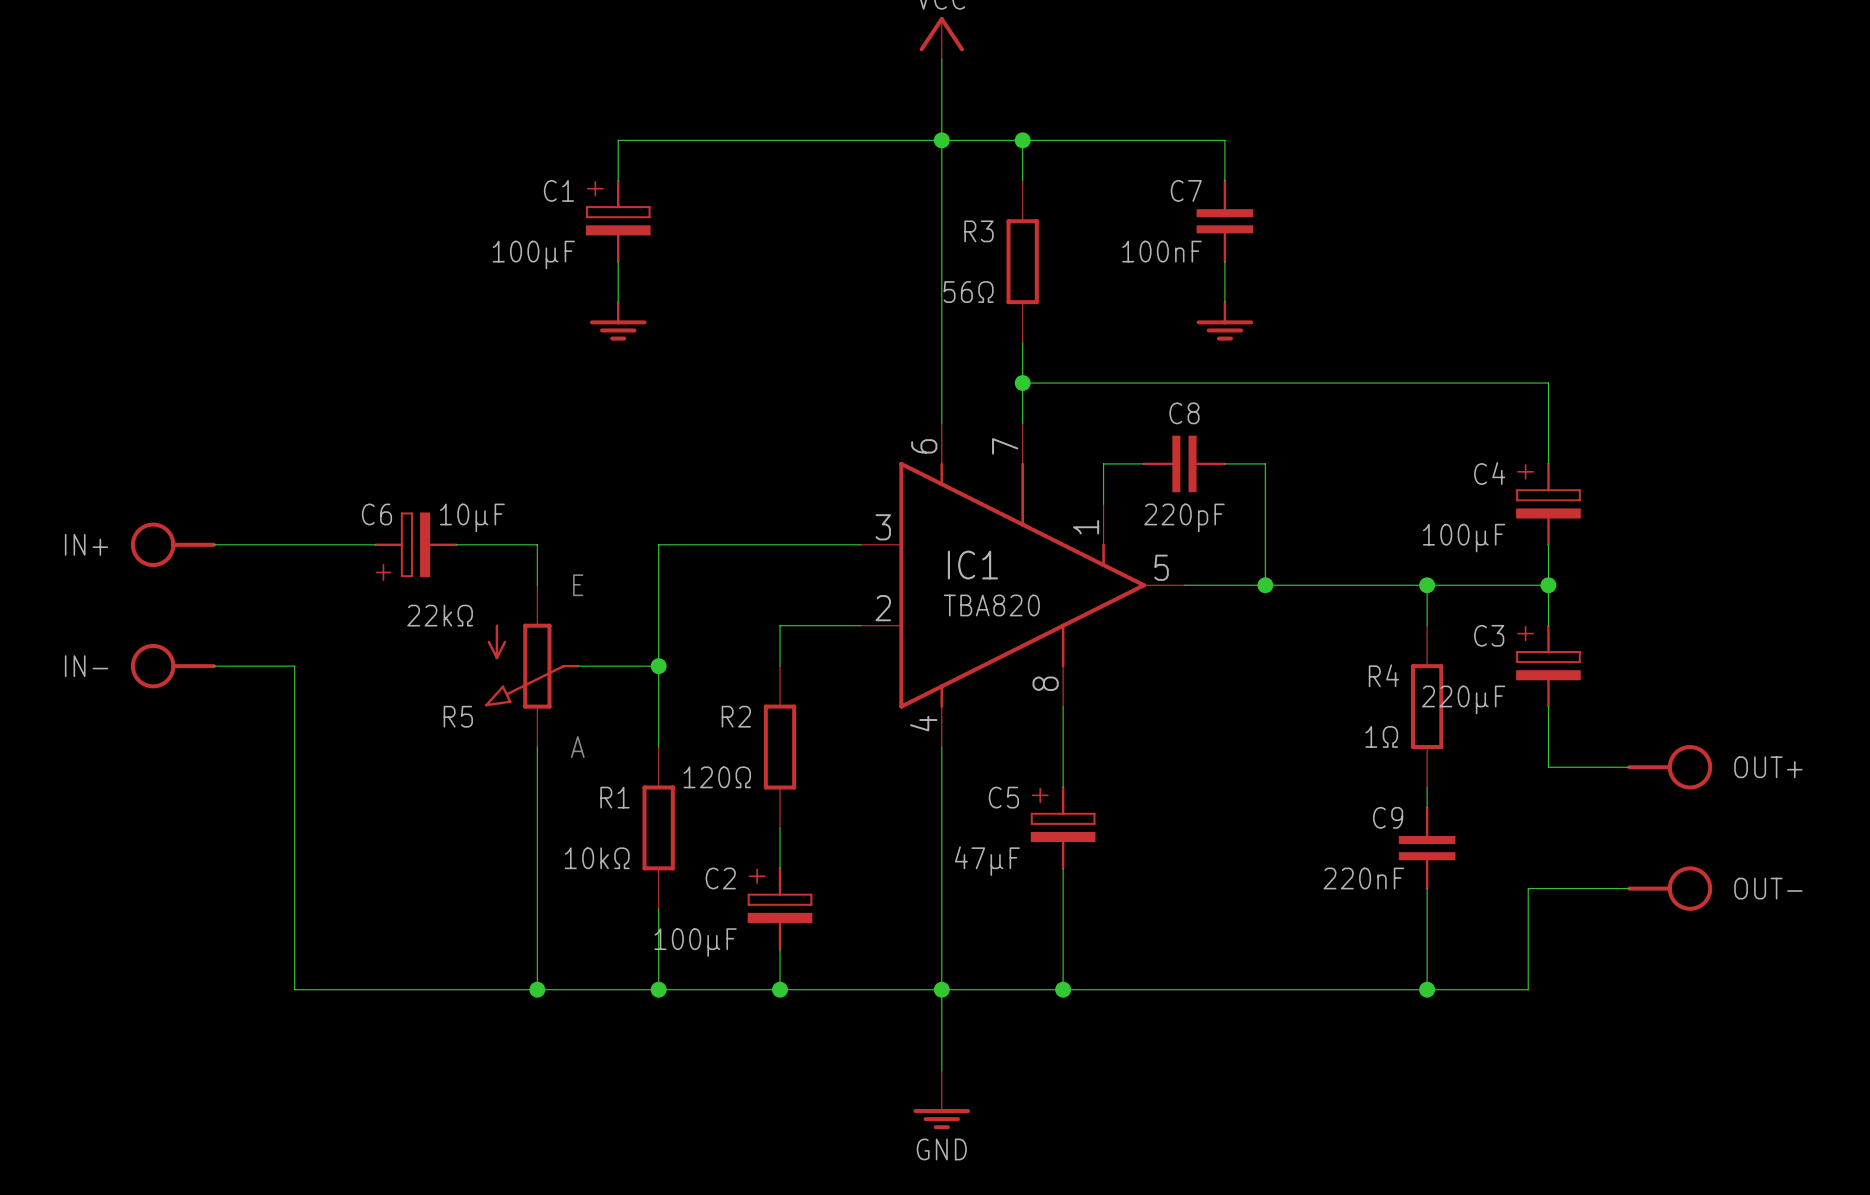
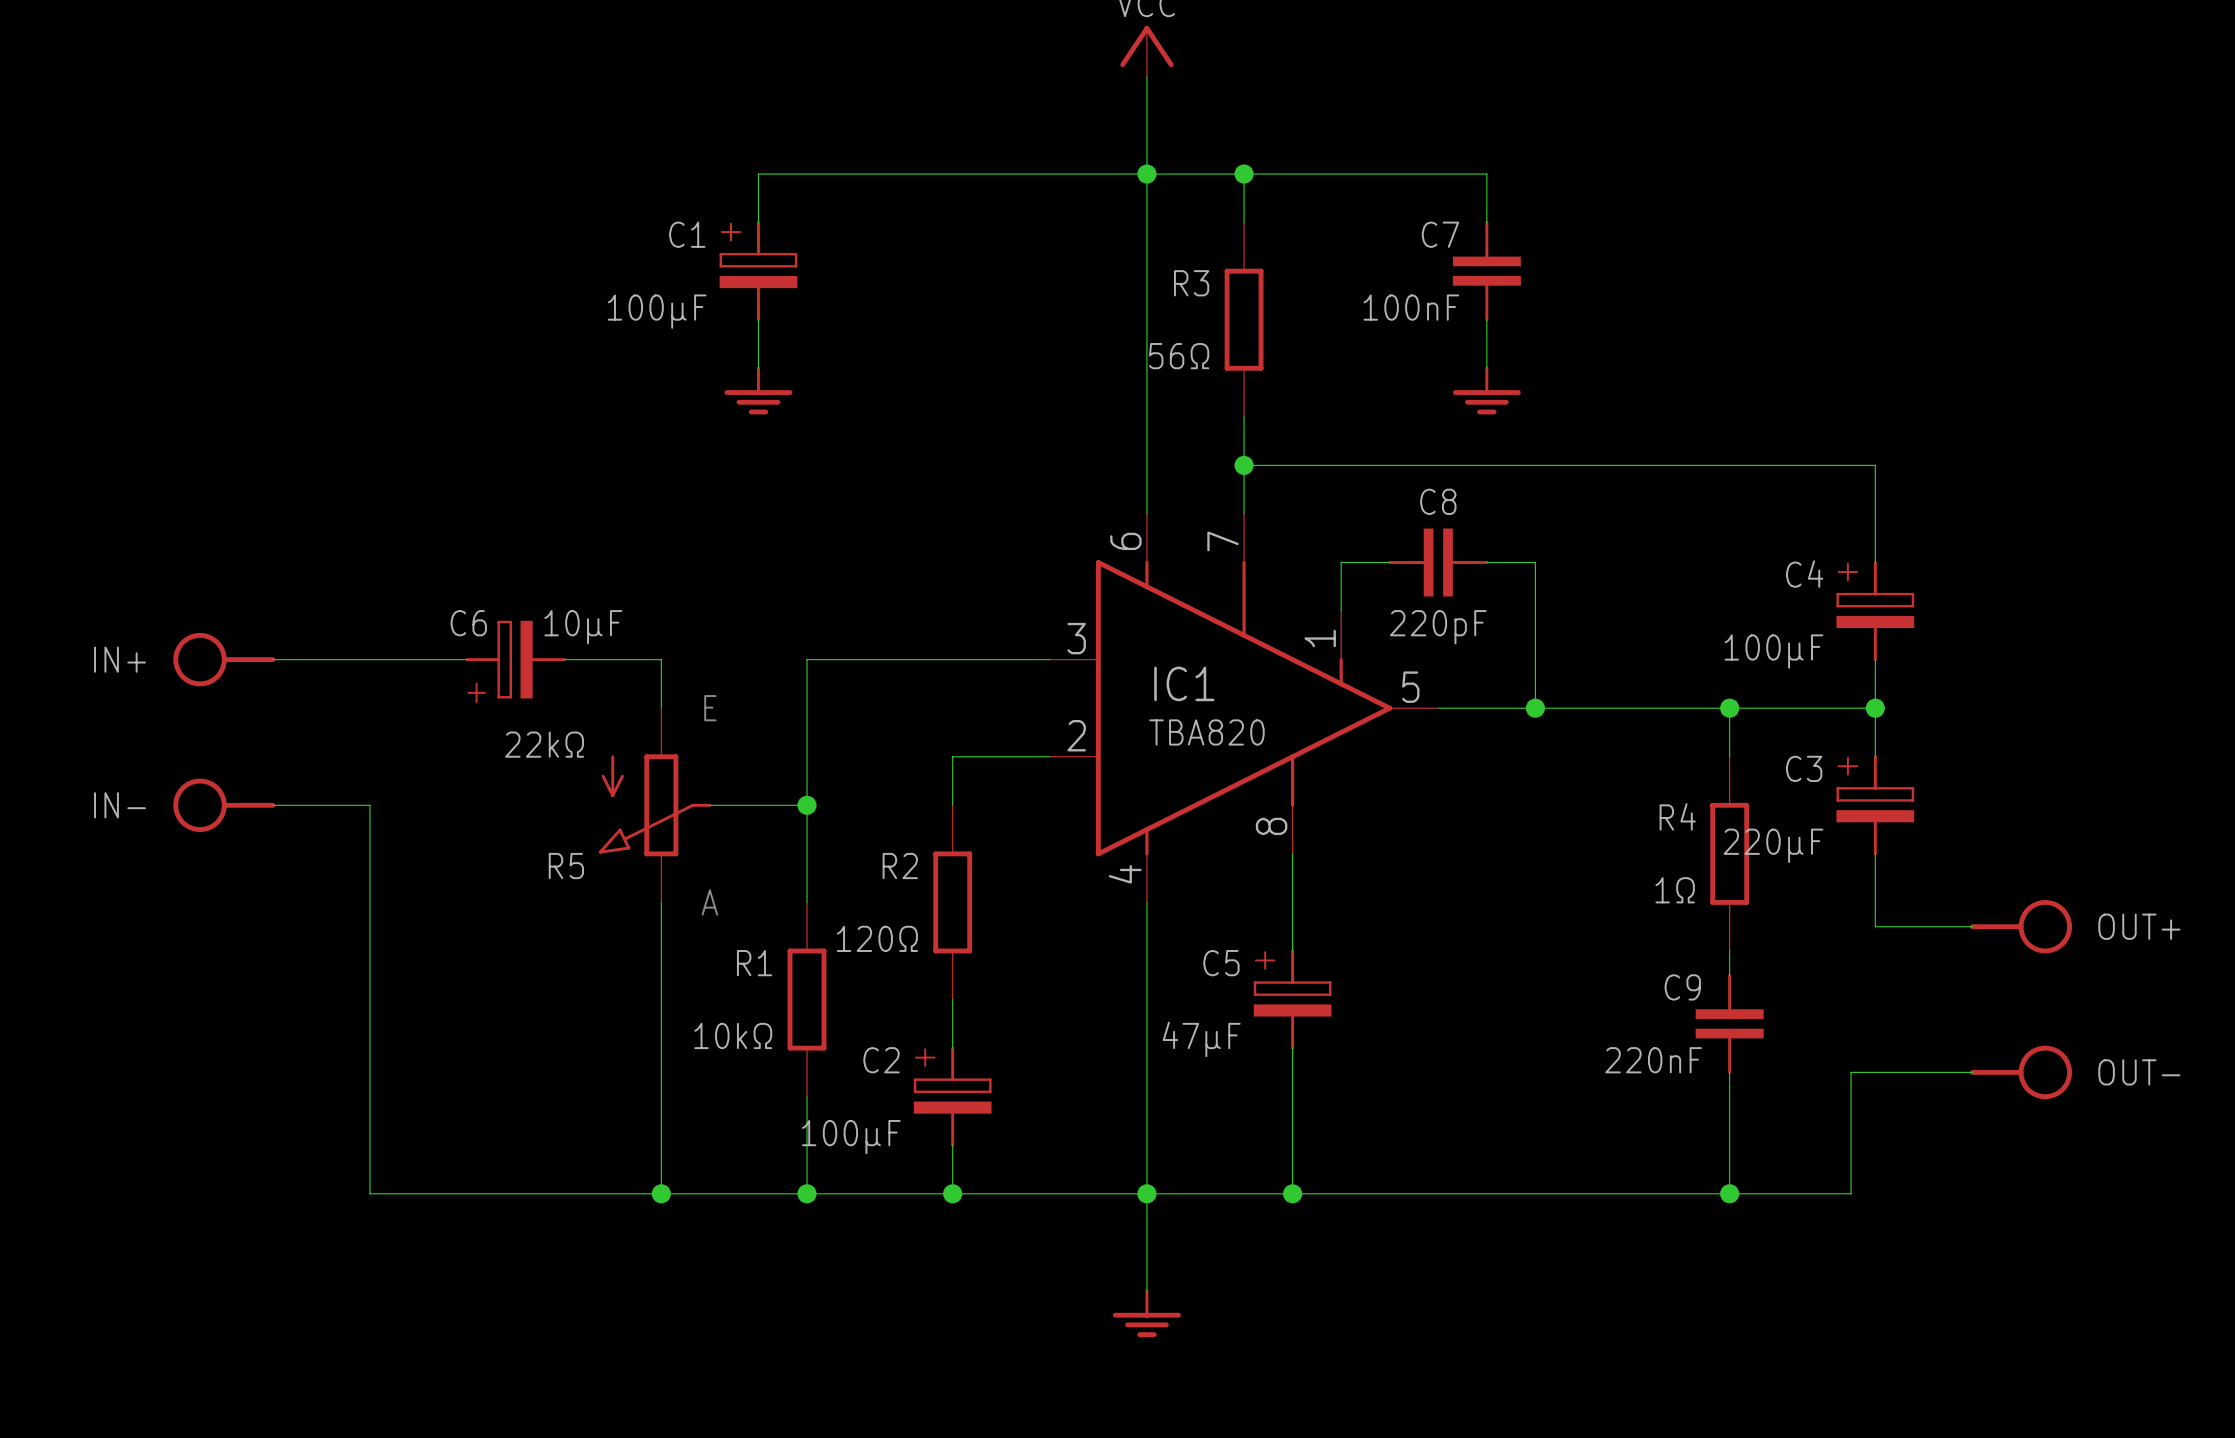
part symbol: [913, 1070, 971, 1130] -> [1112, 1289, 1181, 1338]

